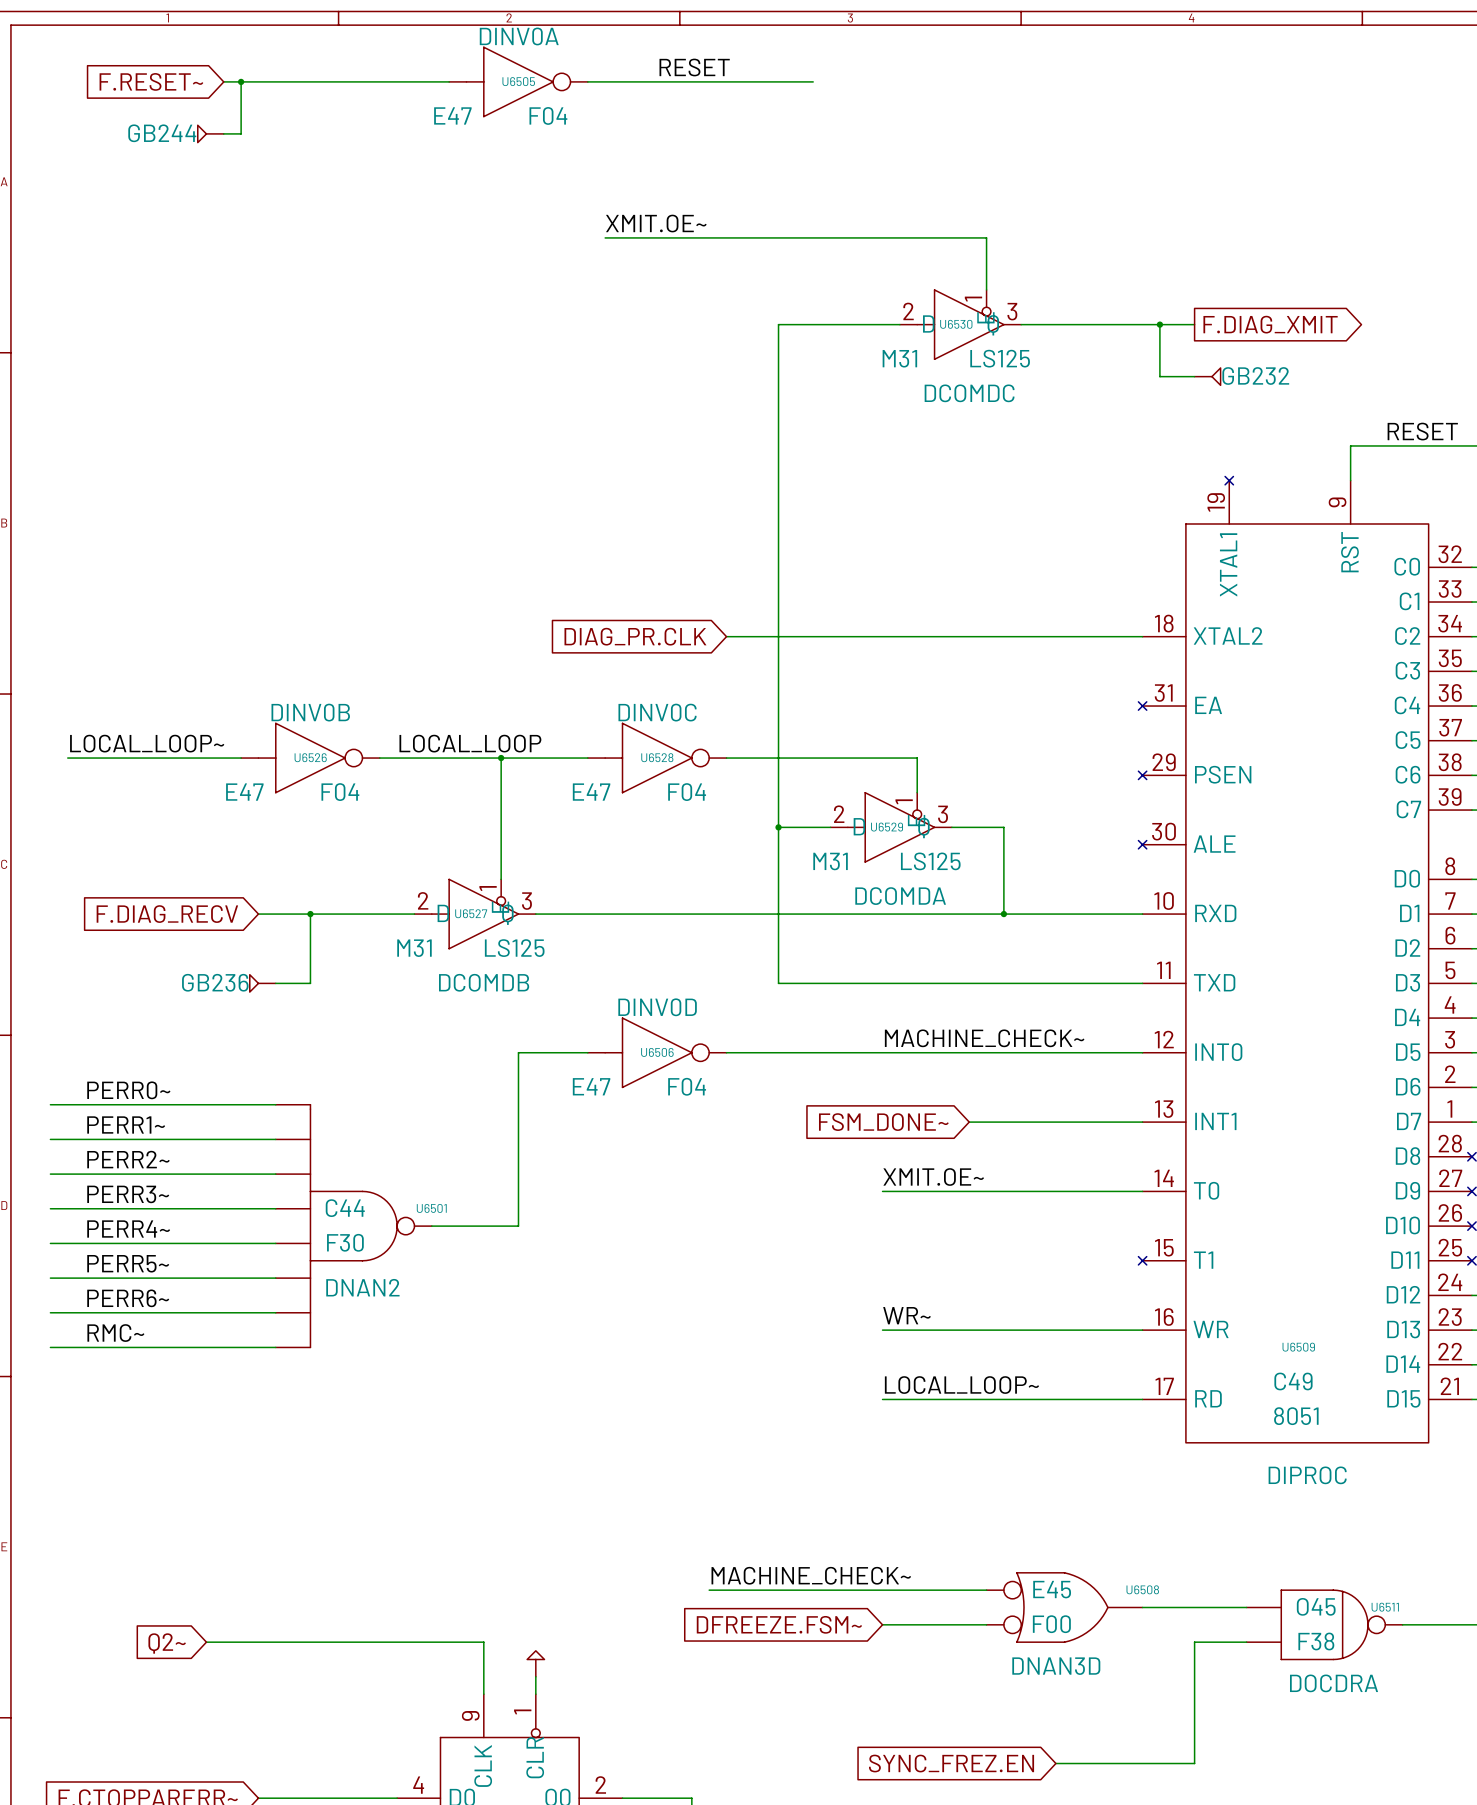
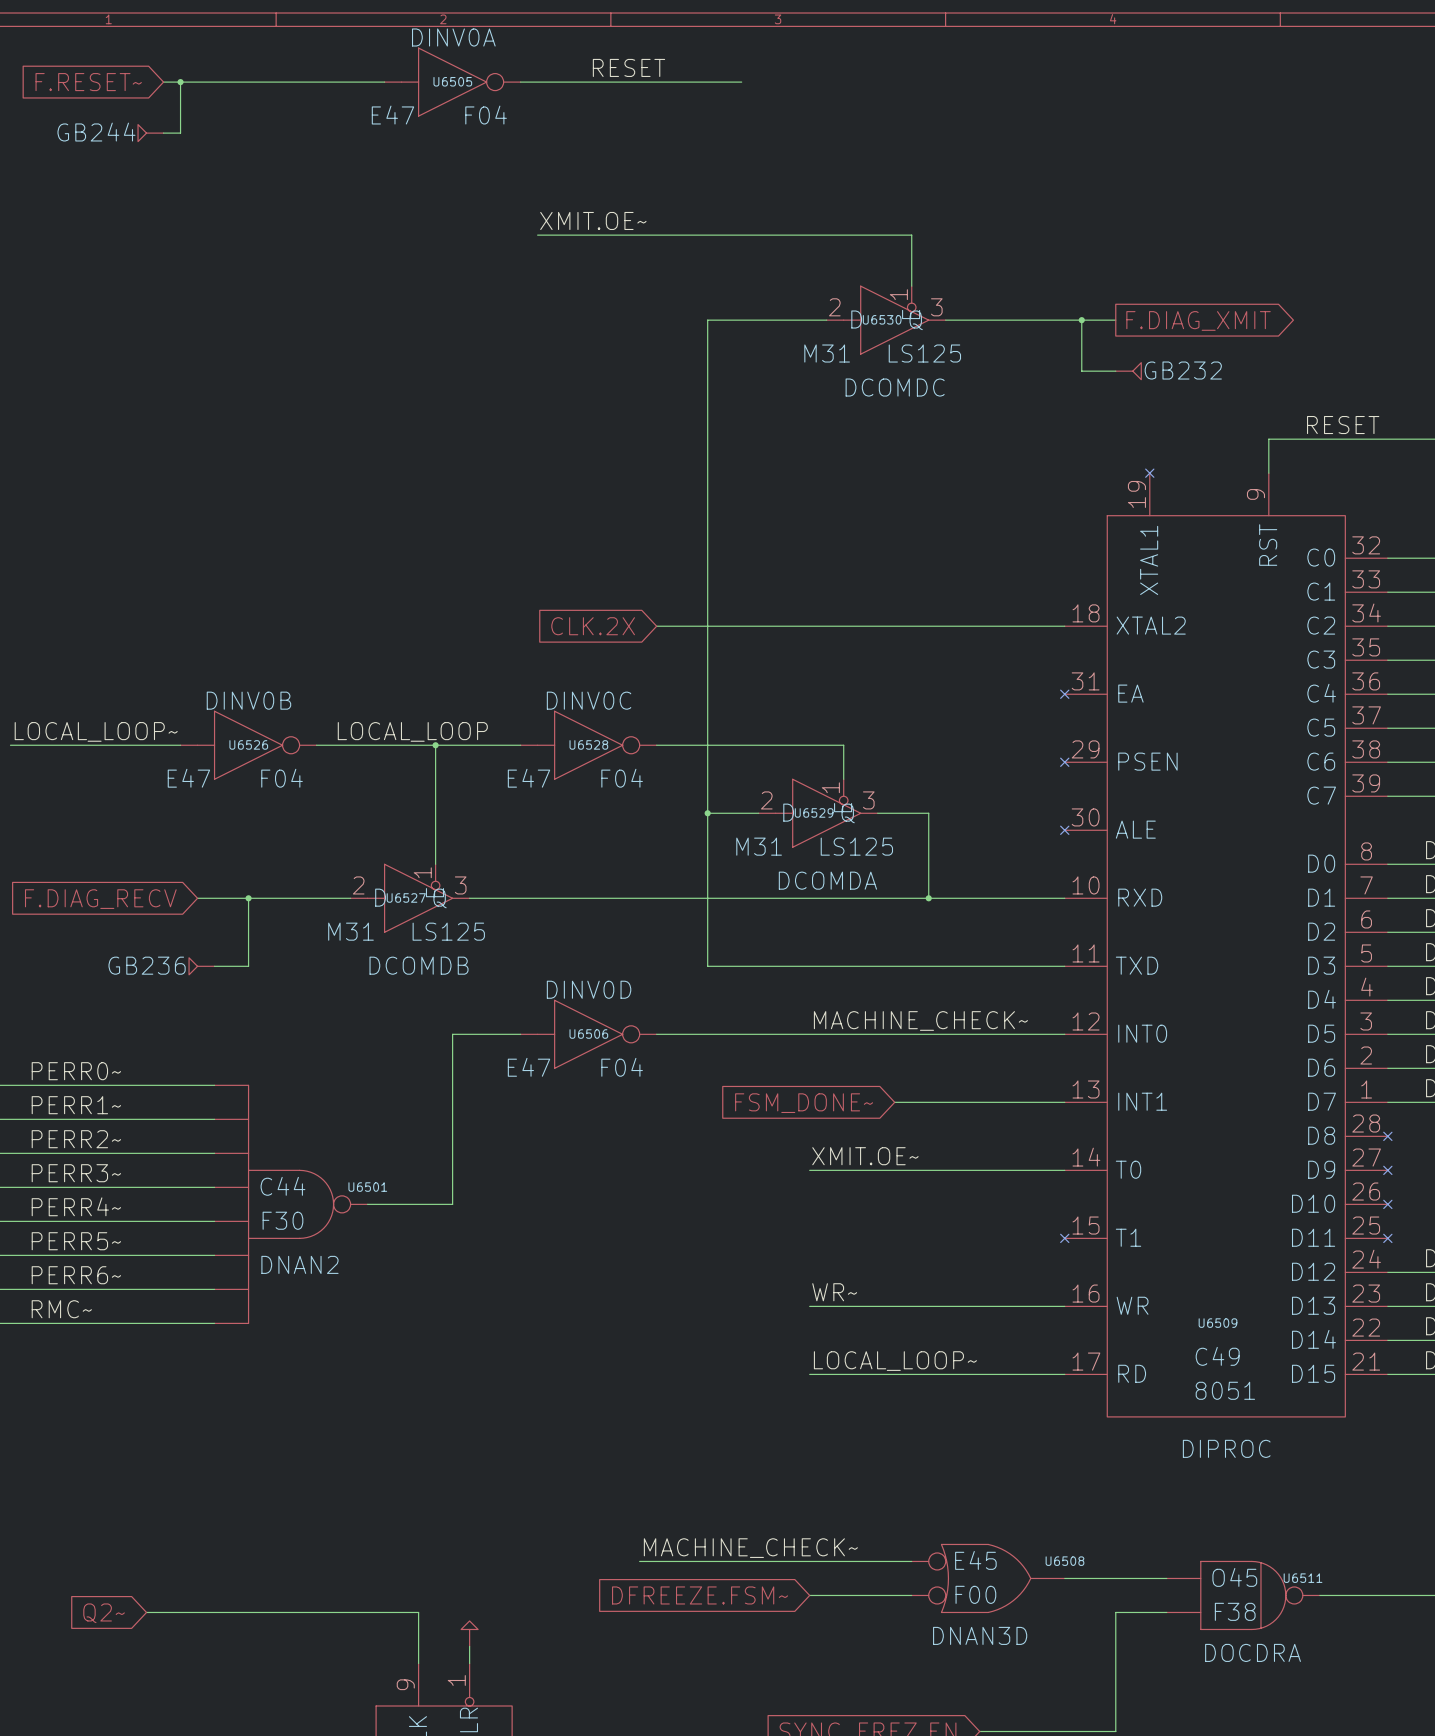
global label: DIAG_PR.CLK (635, 636) -> CLK.2X (593, 626)

